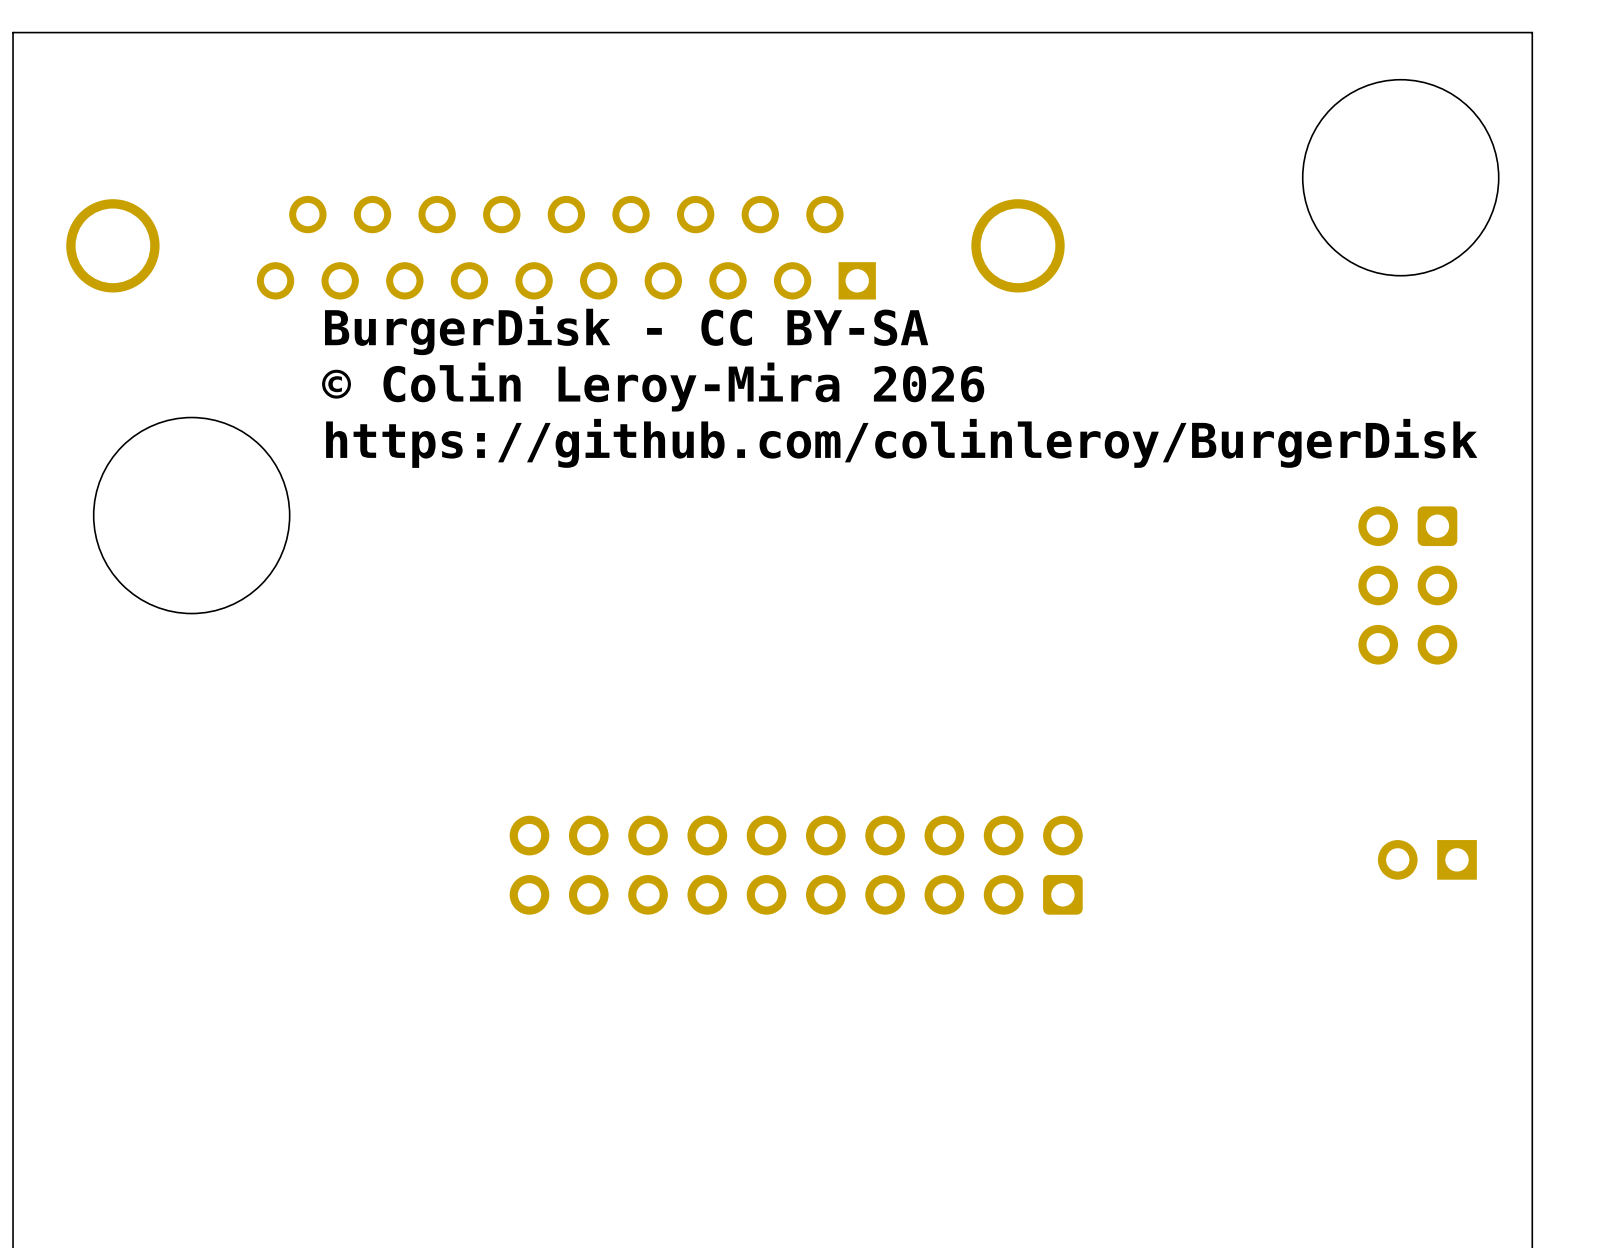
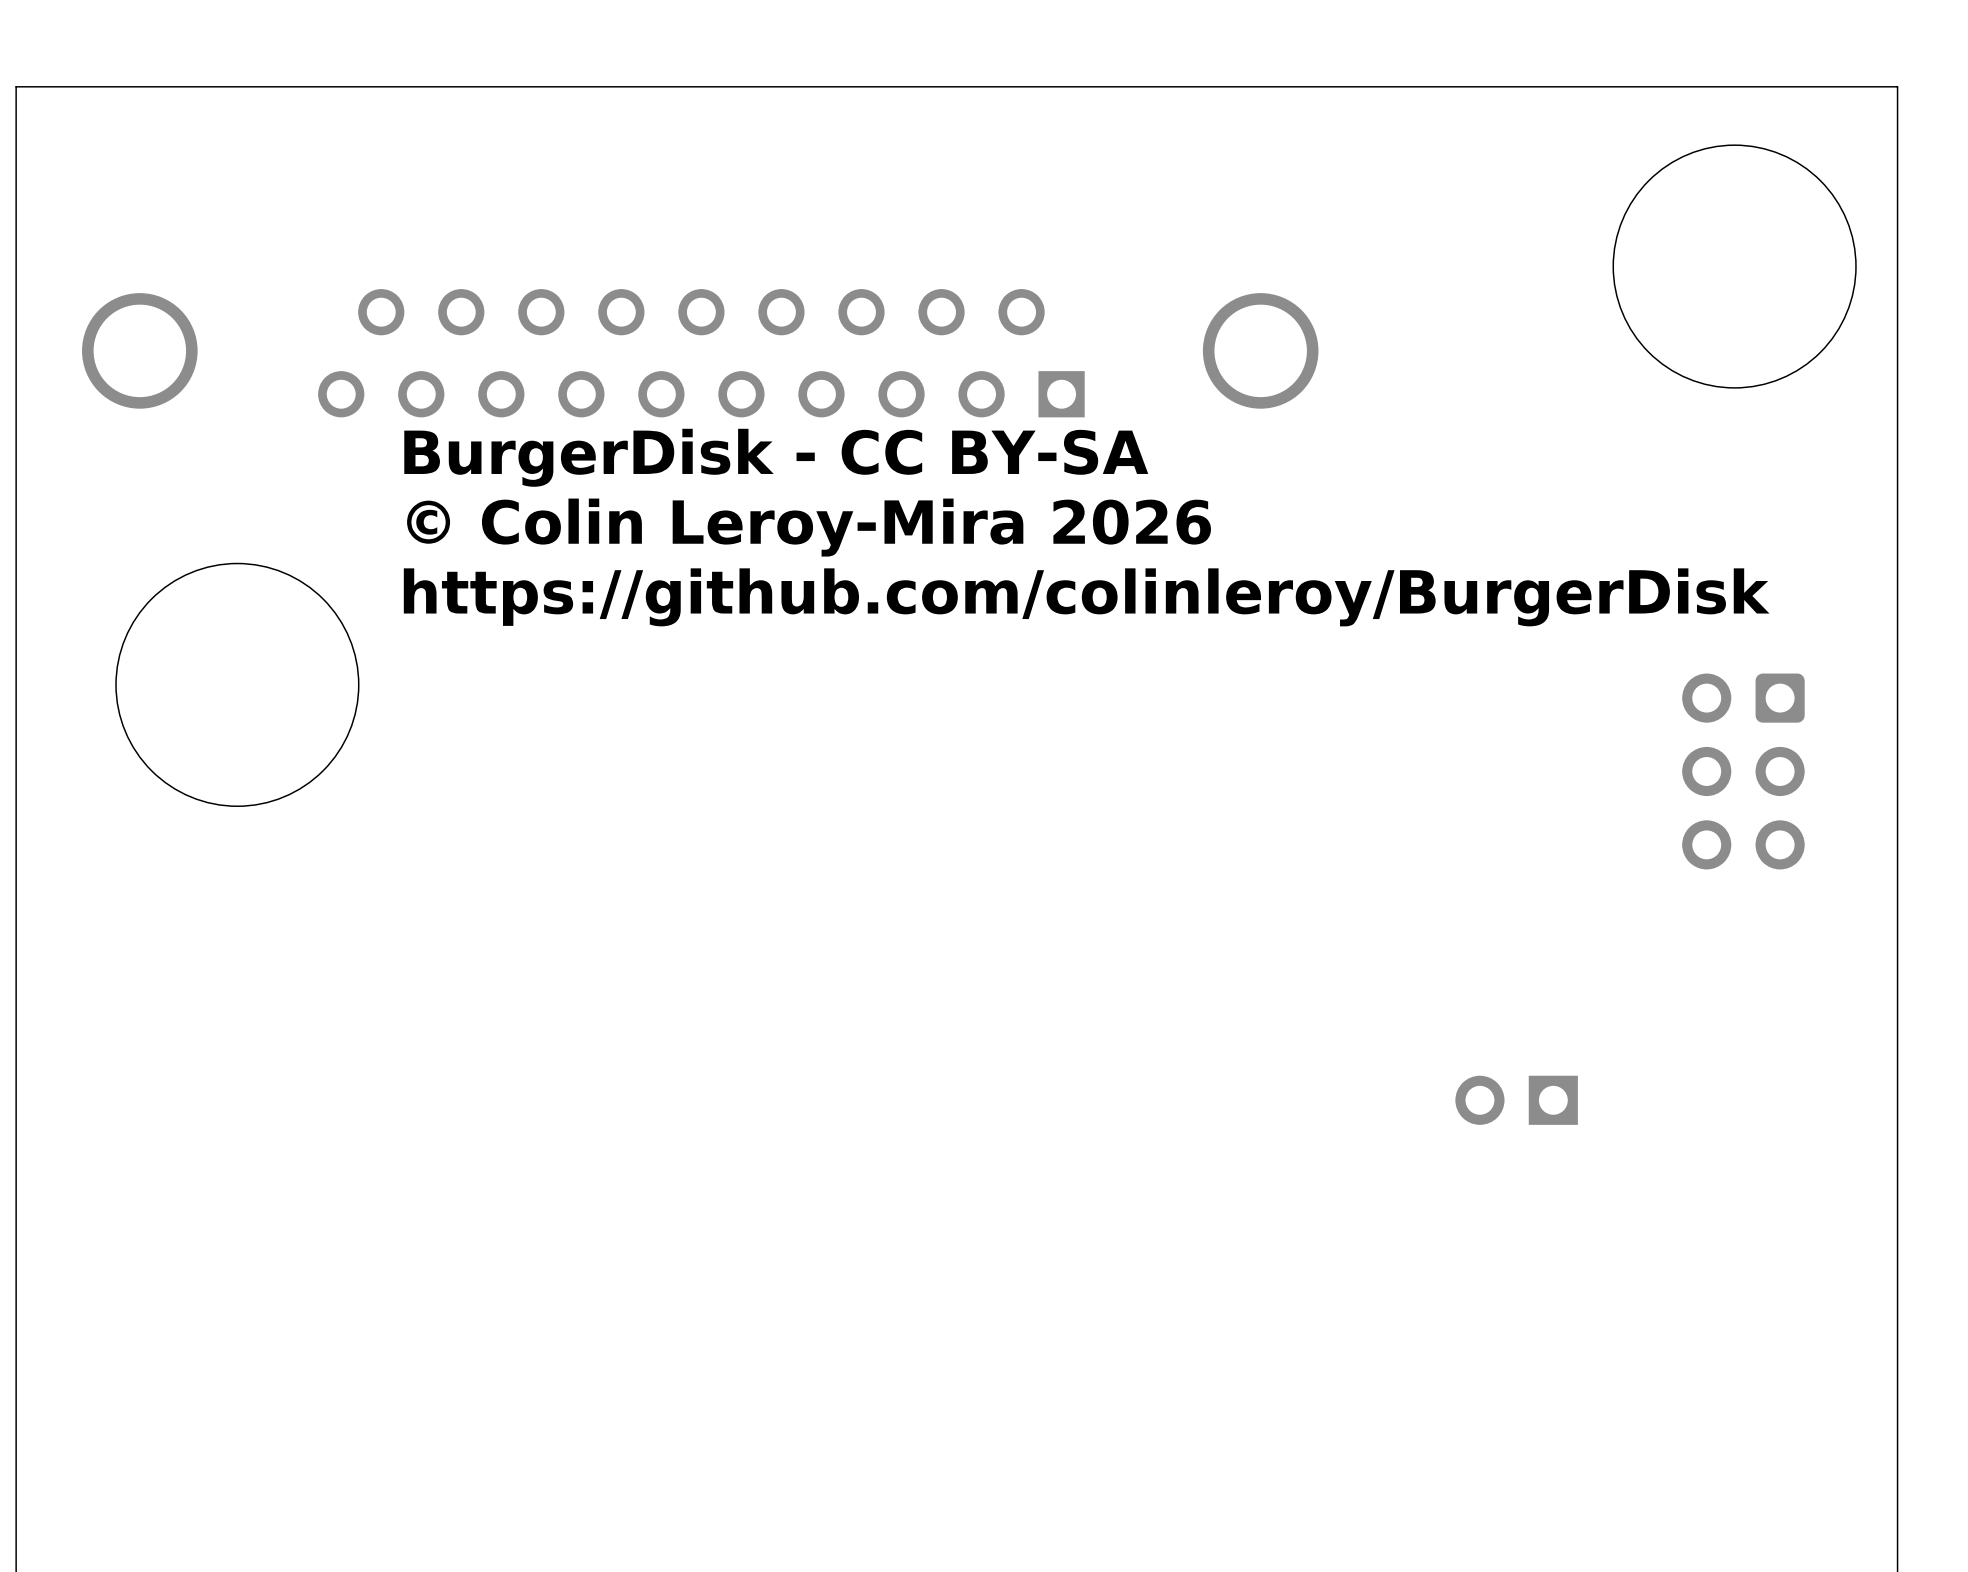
part position: (1427, 859) -> (1516, 1100)
part: (796, 865) -> none

